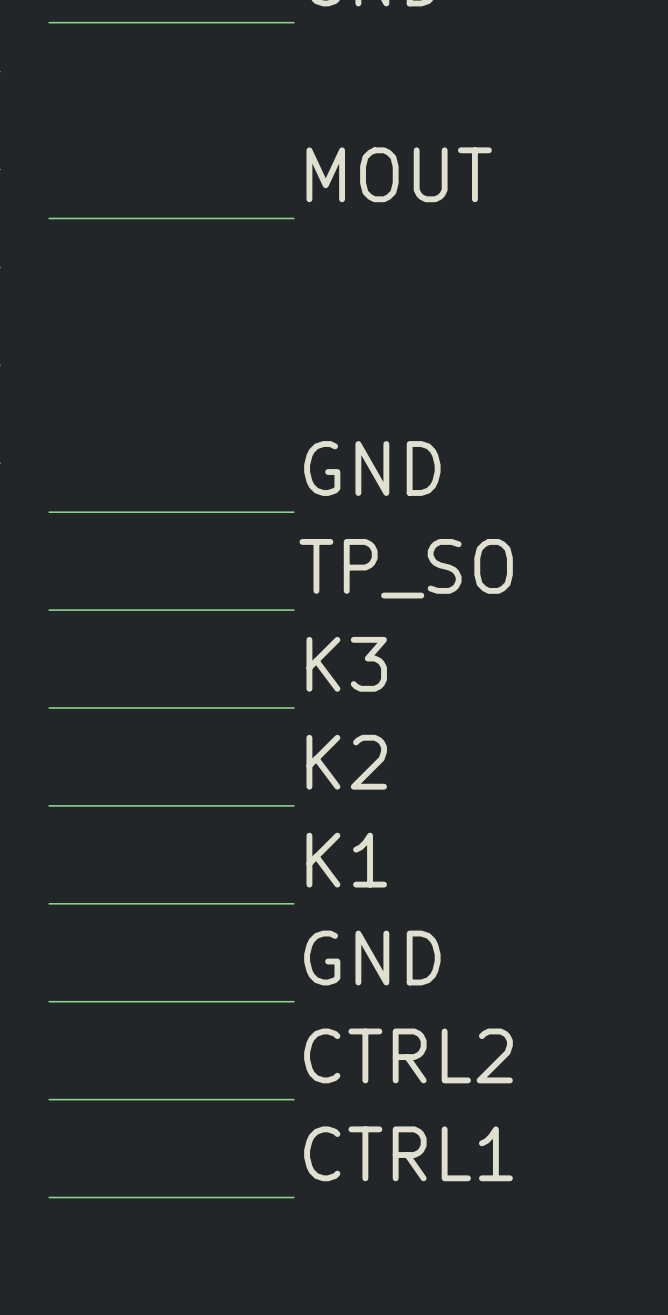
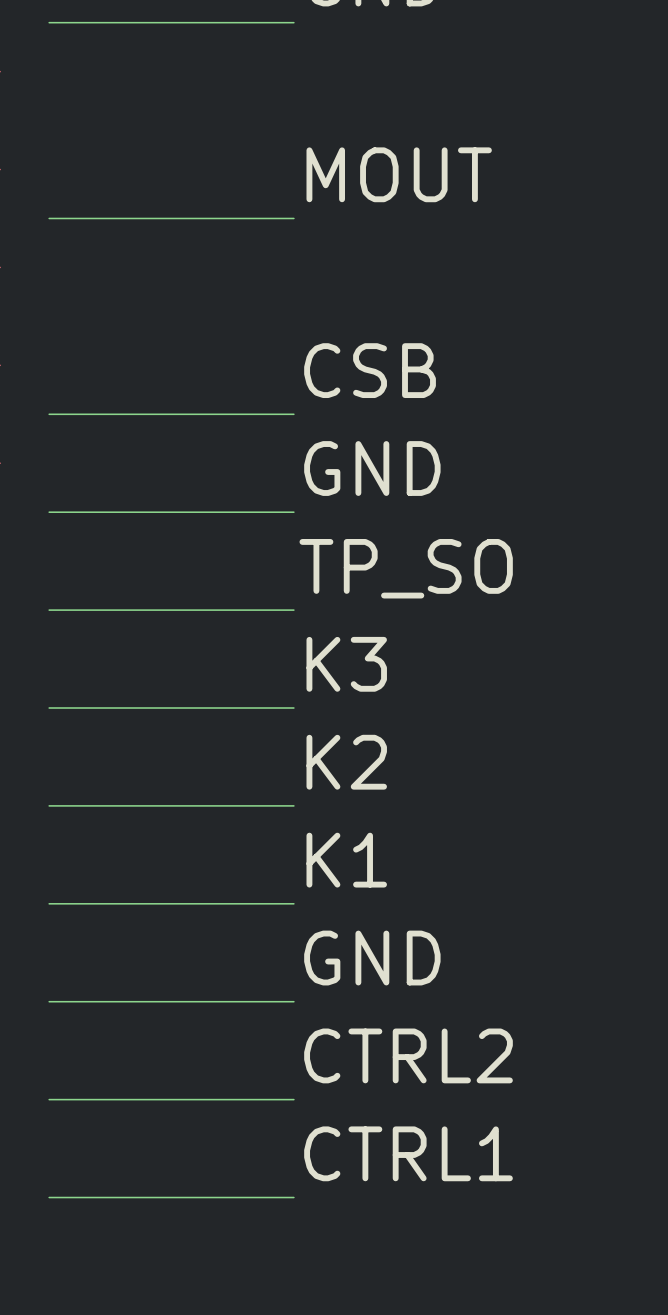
label: none -> CSB (370, 370)
wire: none -> (49, 414) (293, 414)

